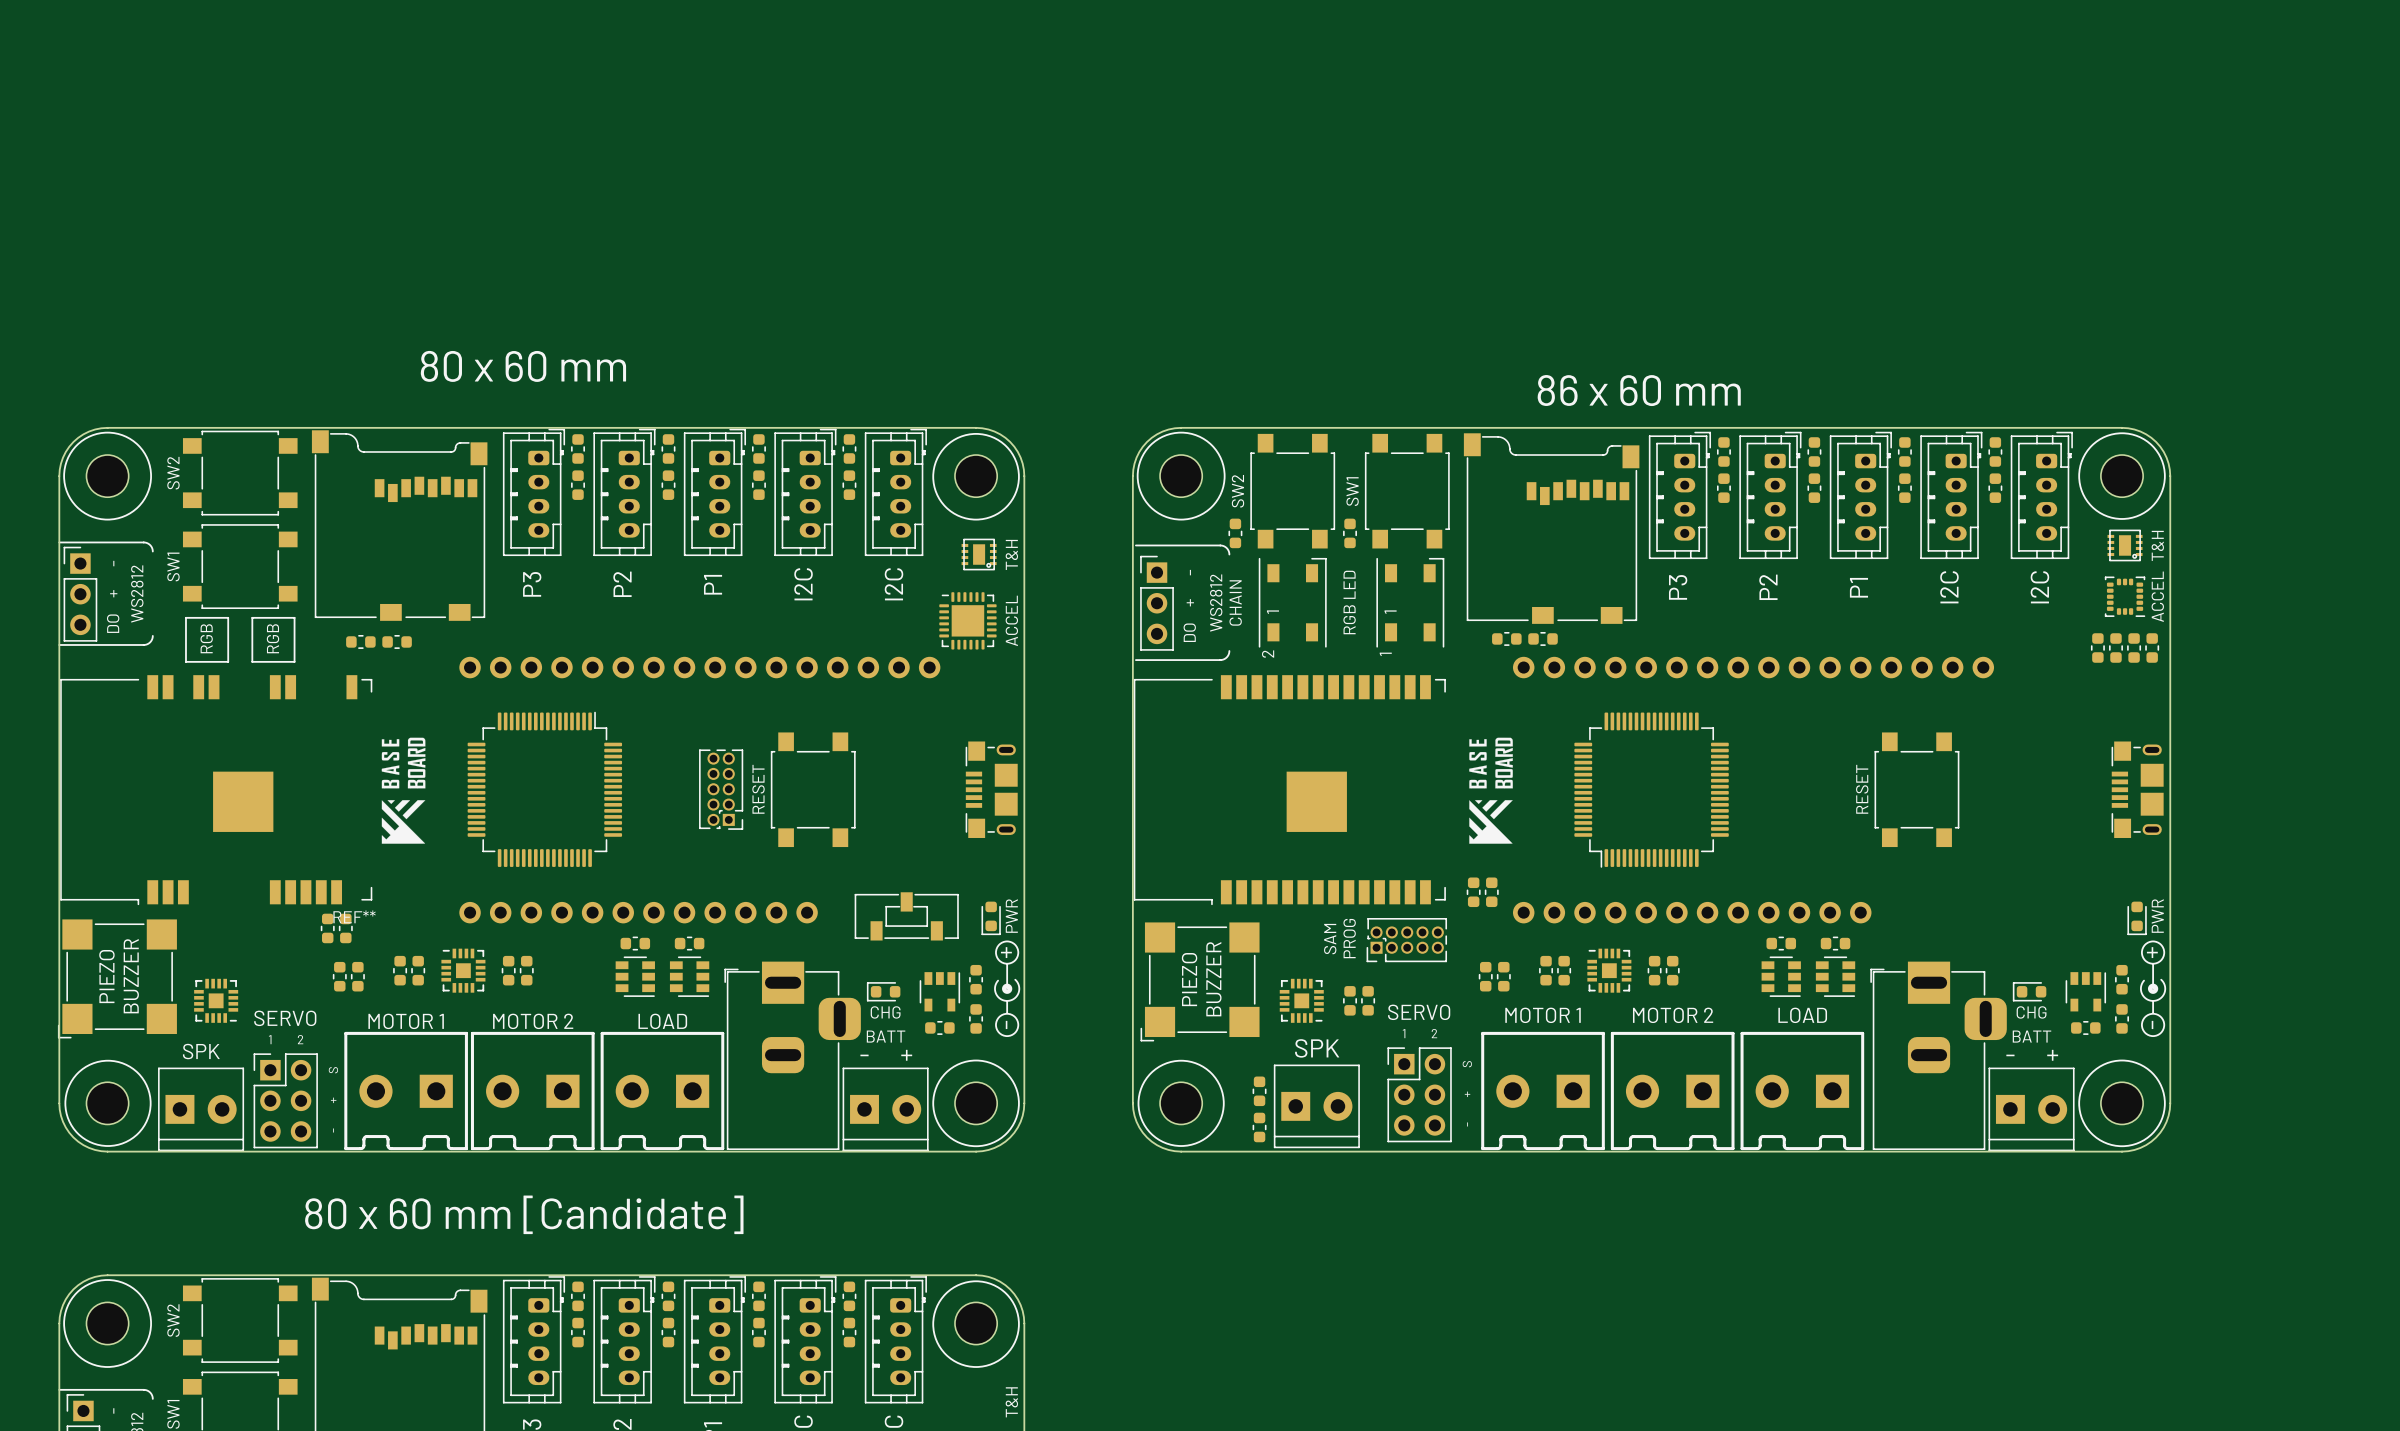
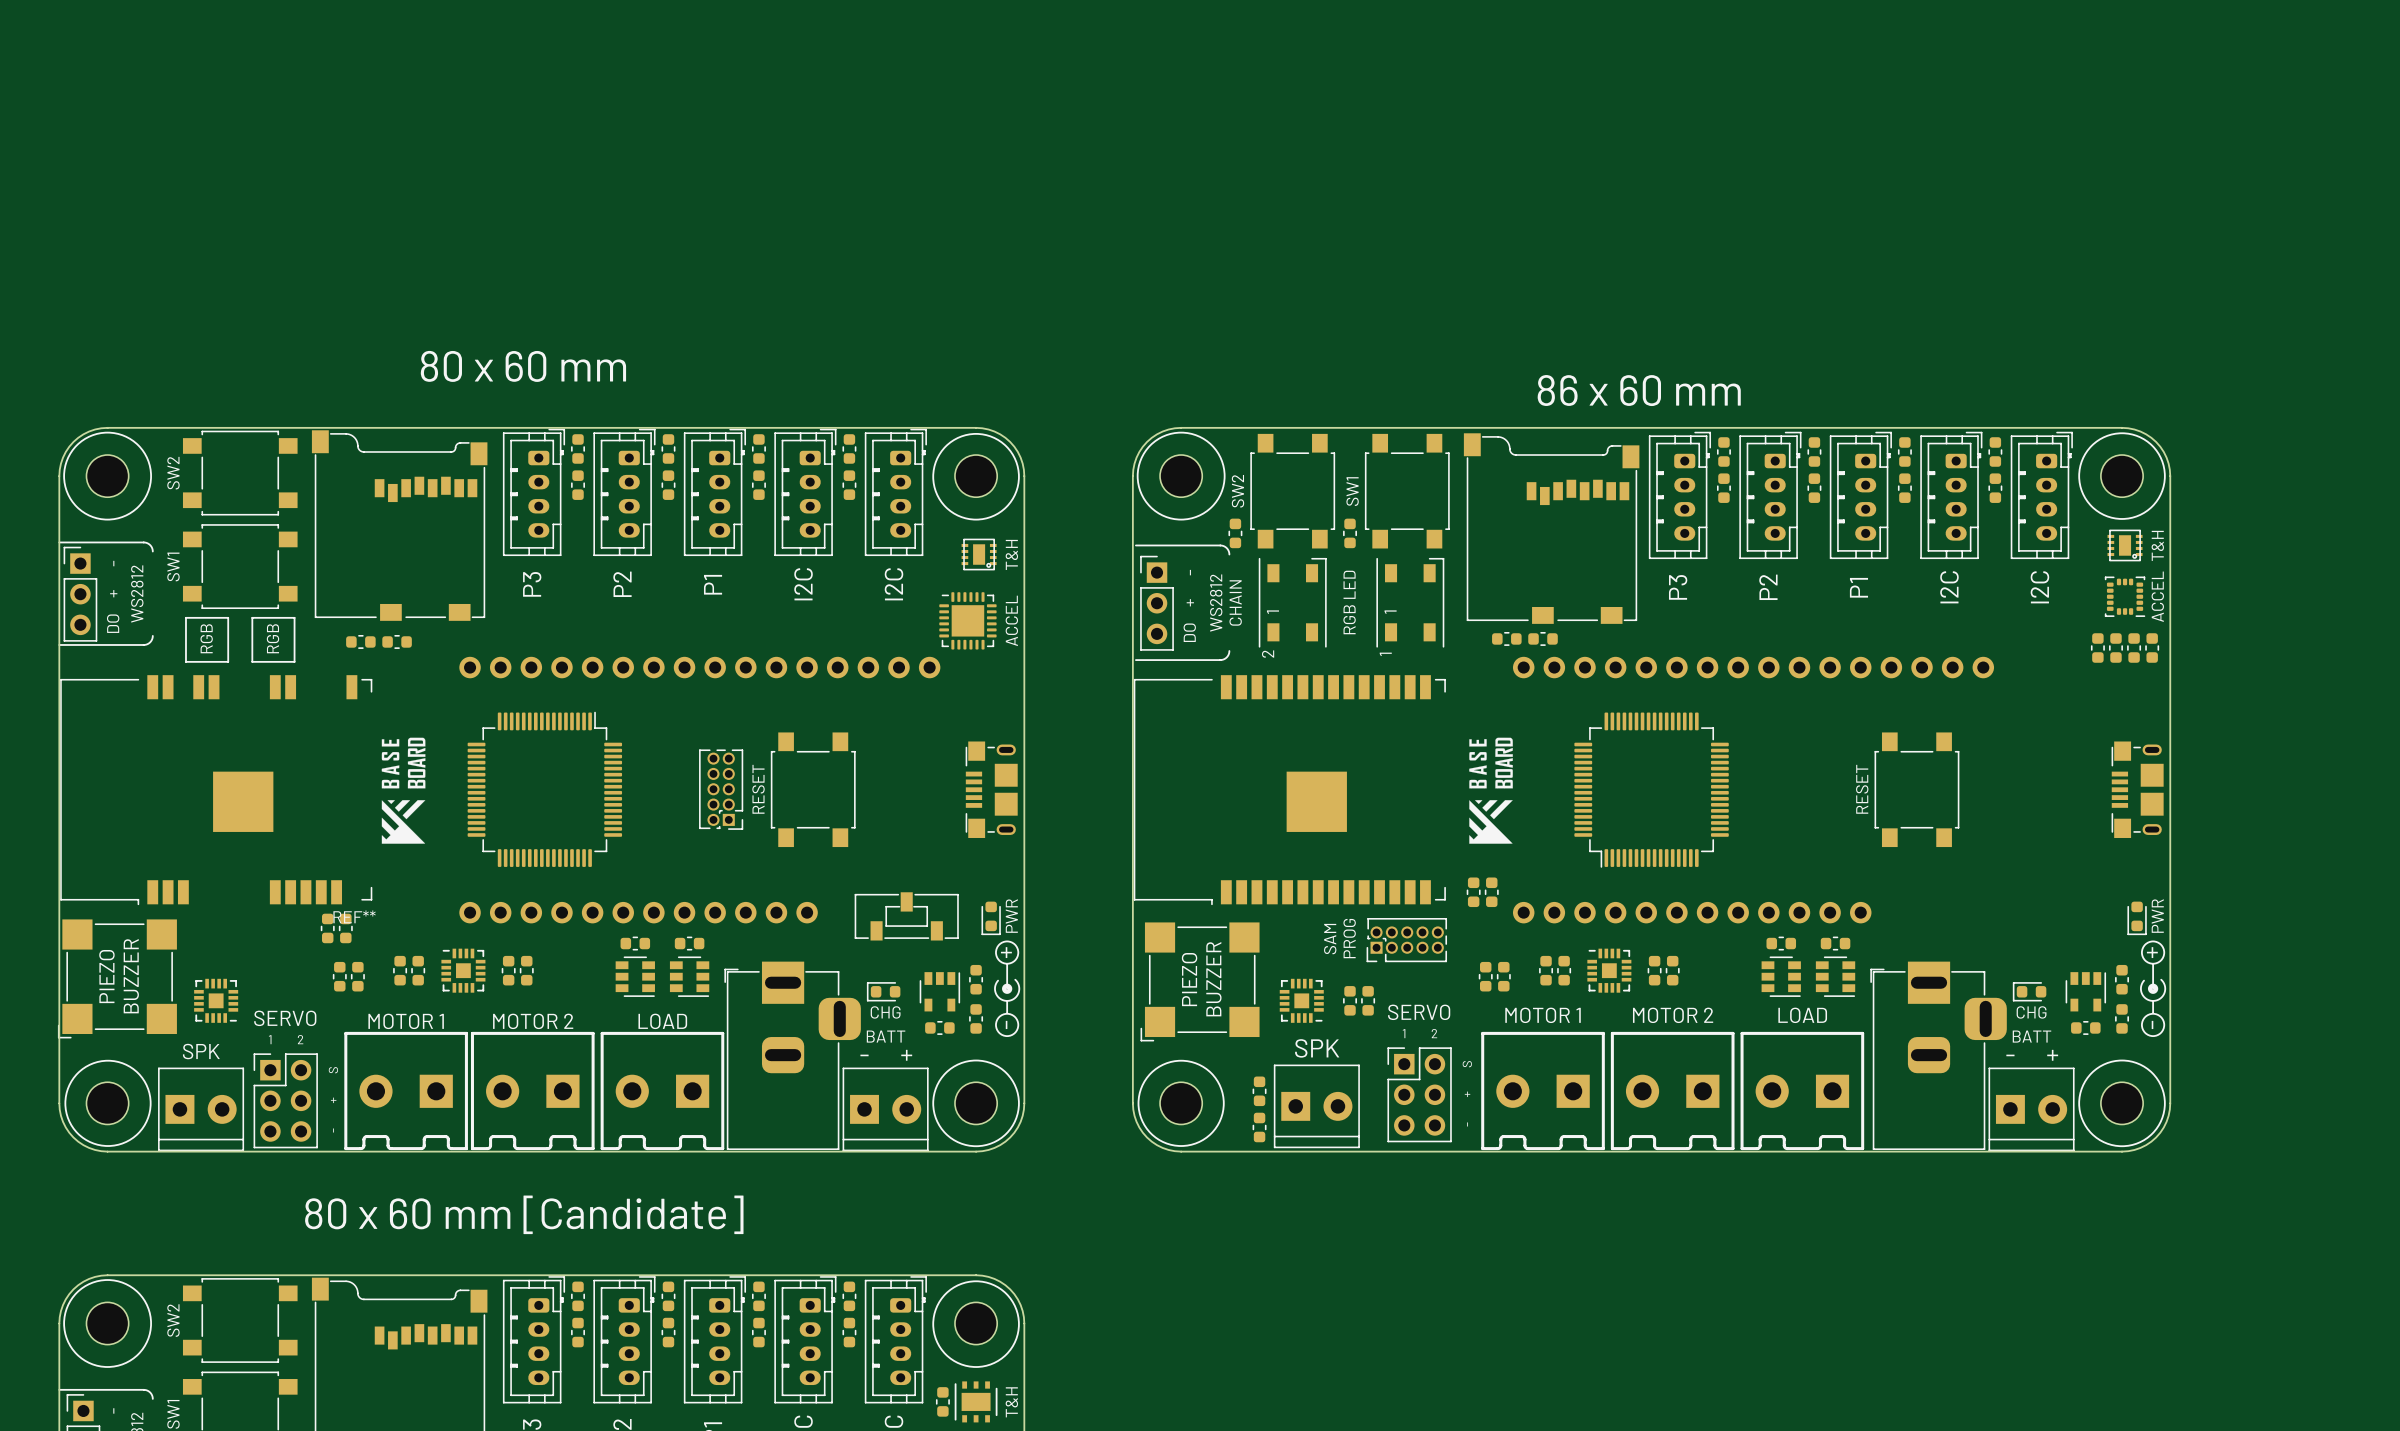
part: none -> (942, 1401)
part: none -> (976, 1401)

